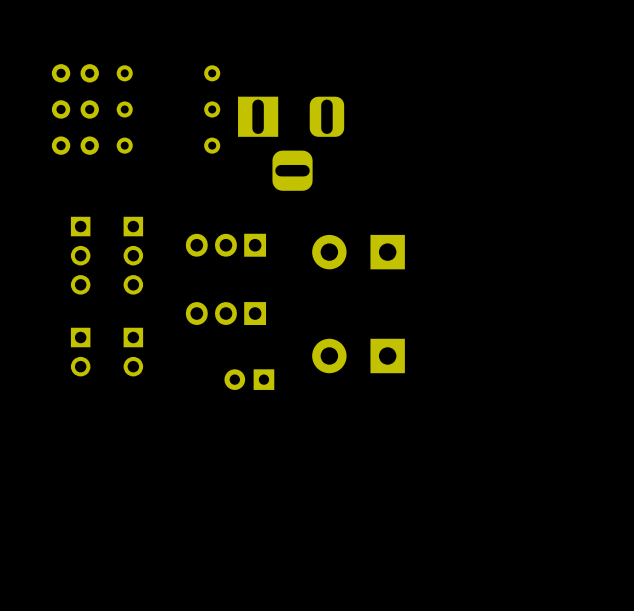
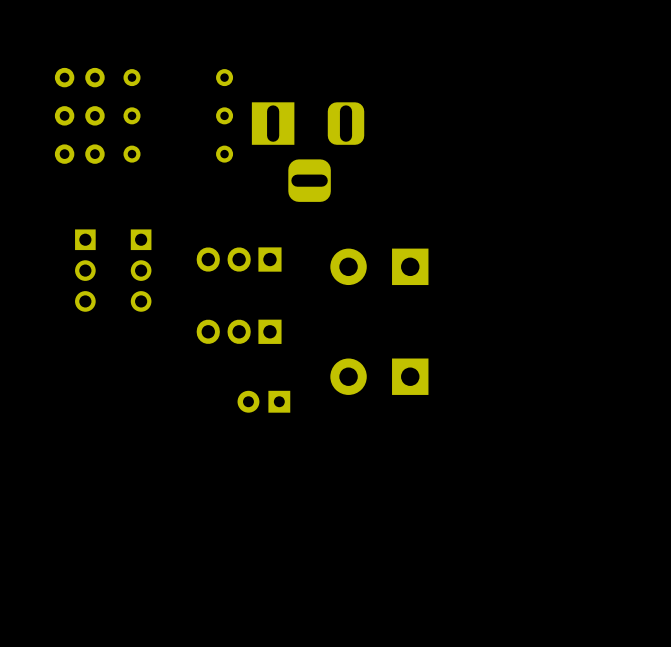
part: (80, 352) -> none
part: (133, 352) -> none

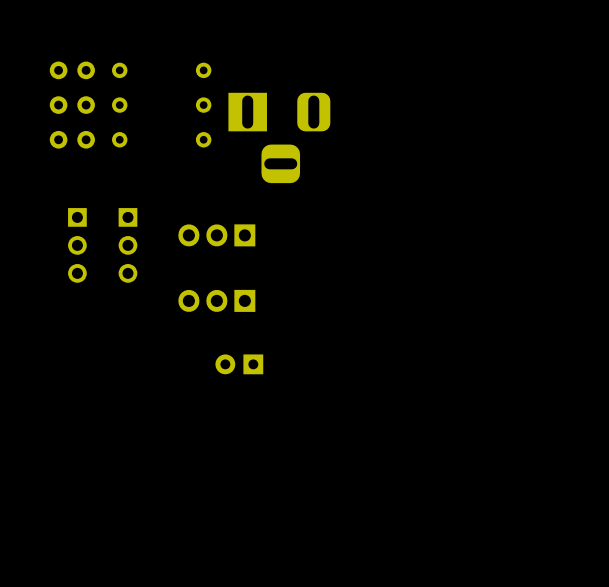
part: (379, 266) -> none
part: (379, 376) -> none

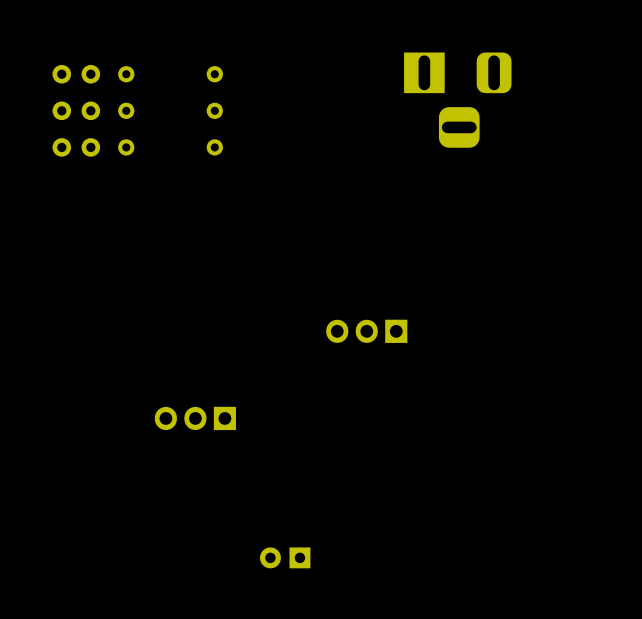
part position: (279, 137) -> (457, 100)
part: (216, 235) -> none
part: (77, 245) -> none
part: (127, 245) -> none
part: (216, 300) -> none
part: none -> (366, 331)
part position: (239, 364) -> (285, 557)
part: none -> (195, 418)

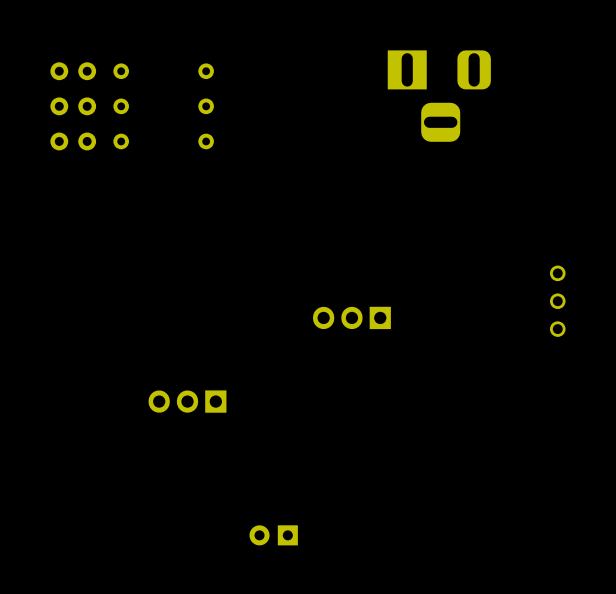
part: none -> (557, 301)

